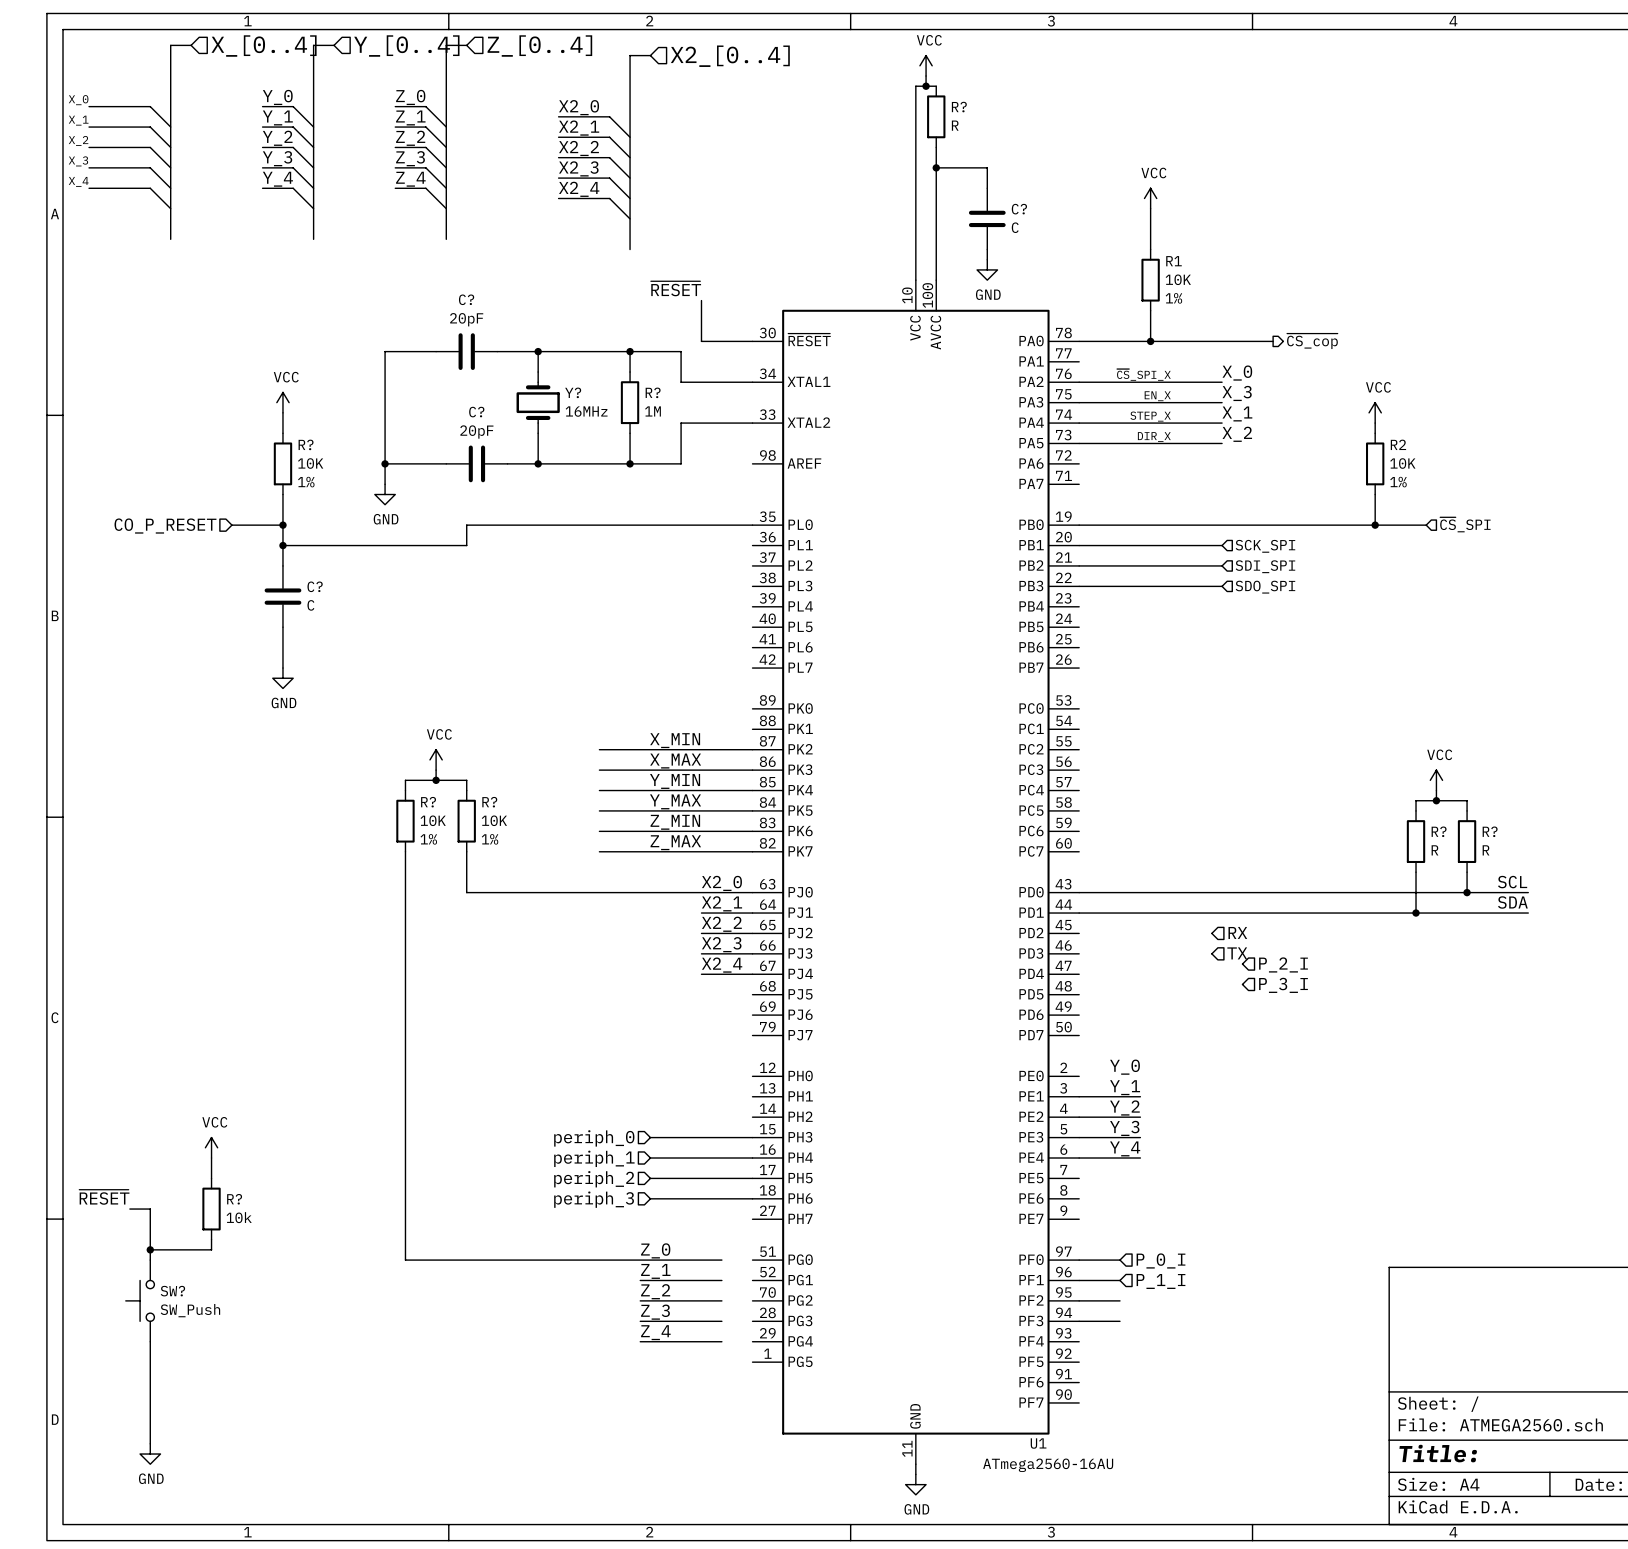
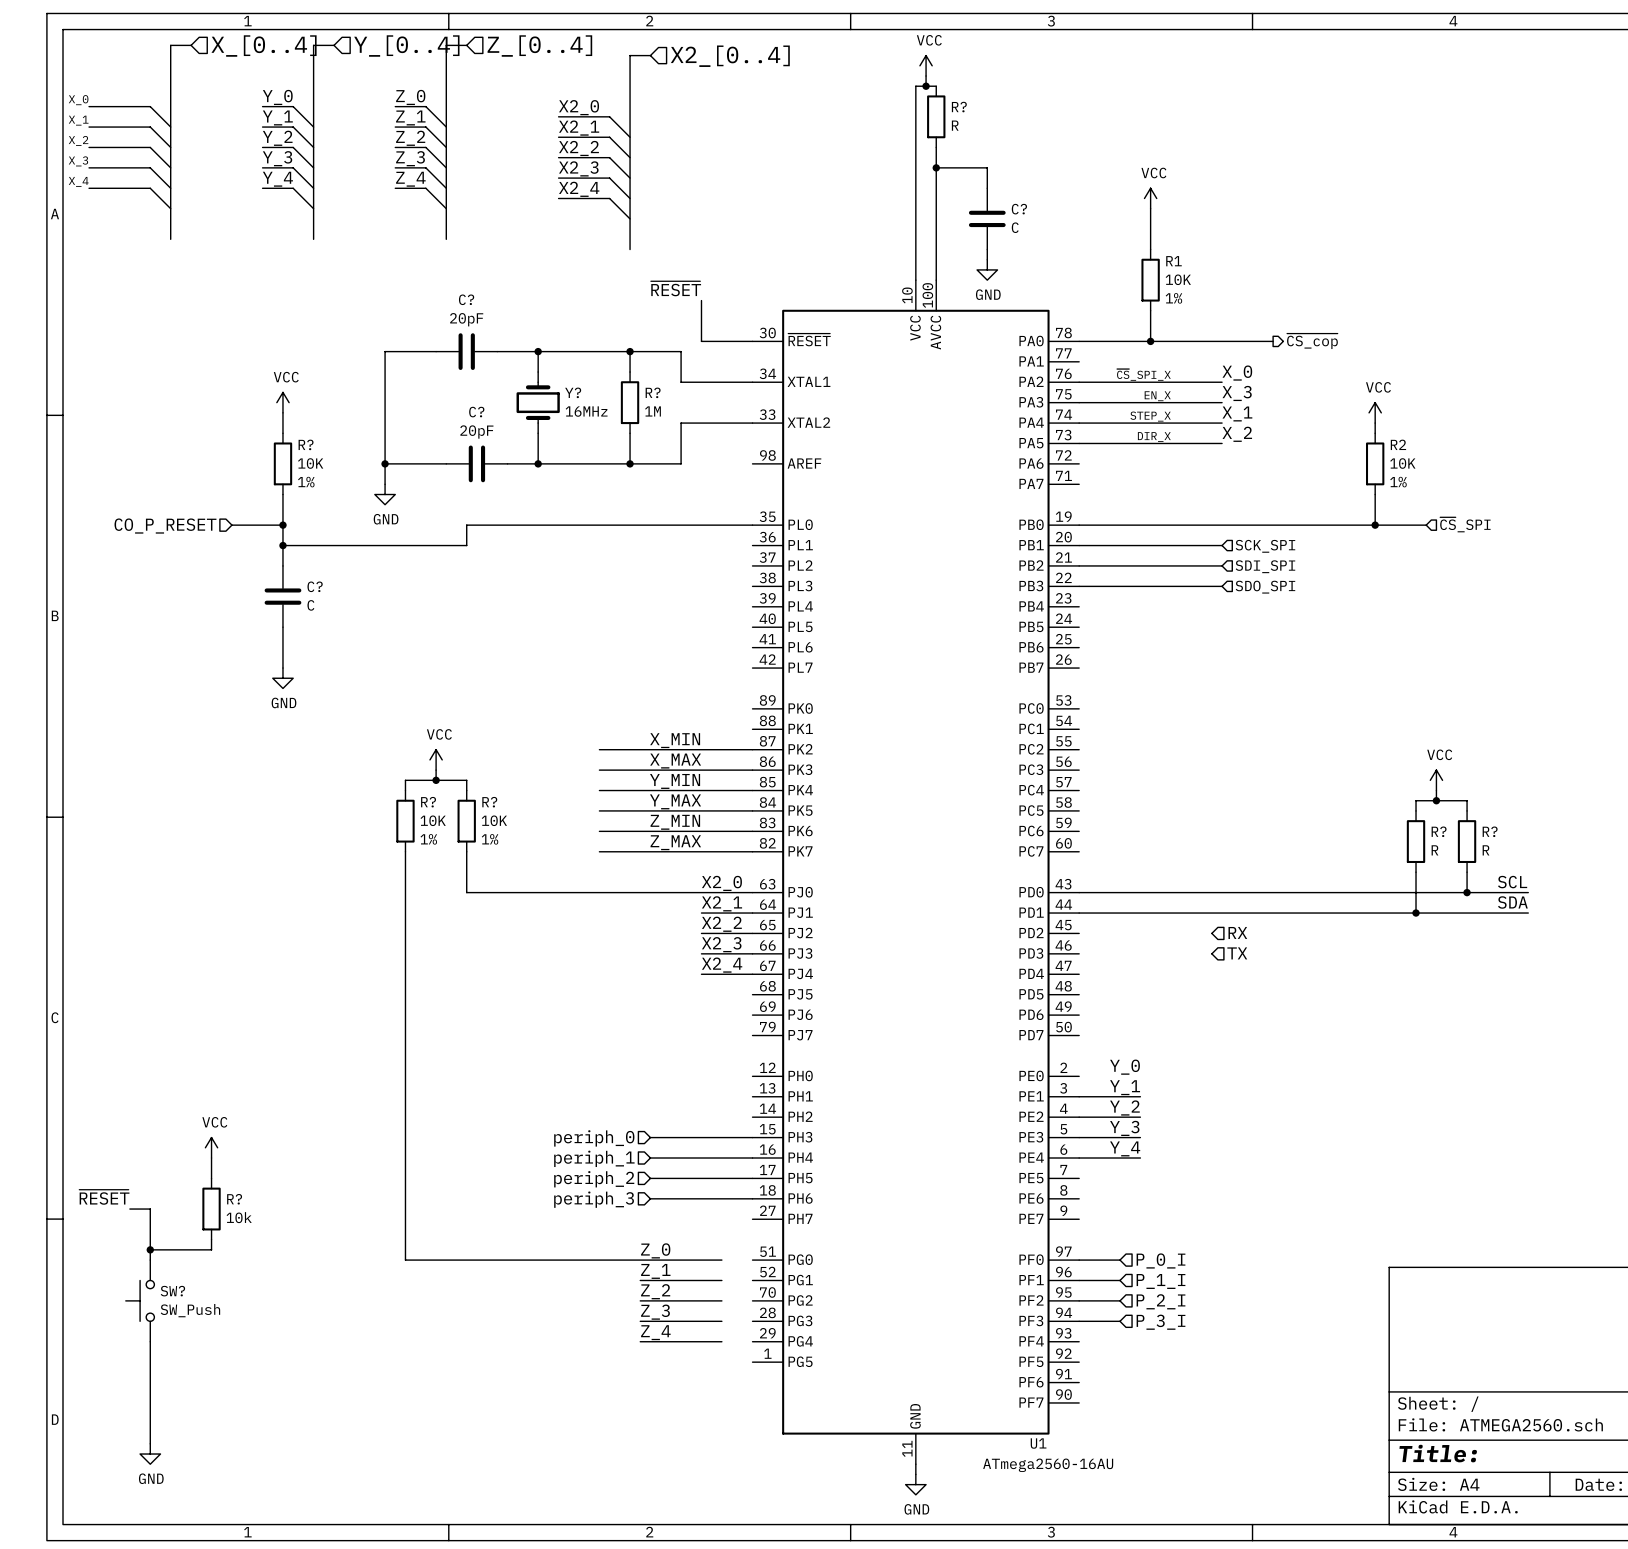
hierarchical label: P_2_I (1283, 964) -> none
hierarchical label: P_3_I (1283, 985) -> none
hierarchical label: none -> P_2_I (1161, 1301)
hierarchical label: none -> P_3_I (1161, 1322)

